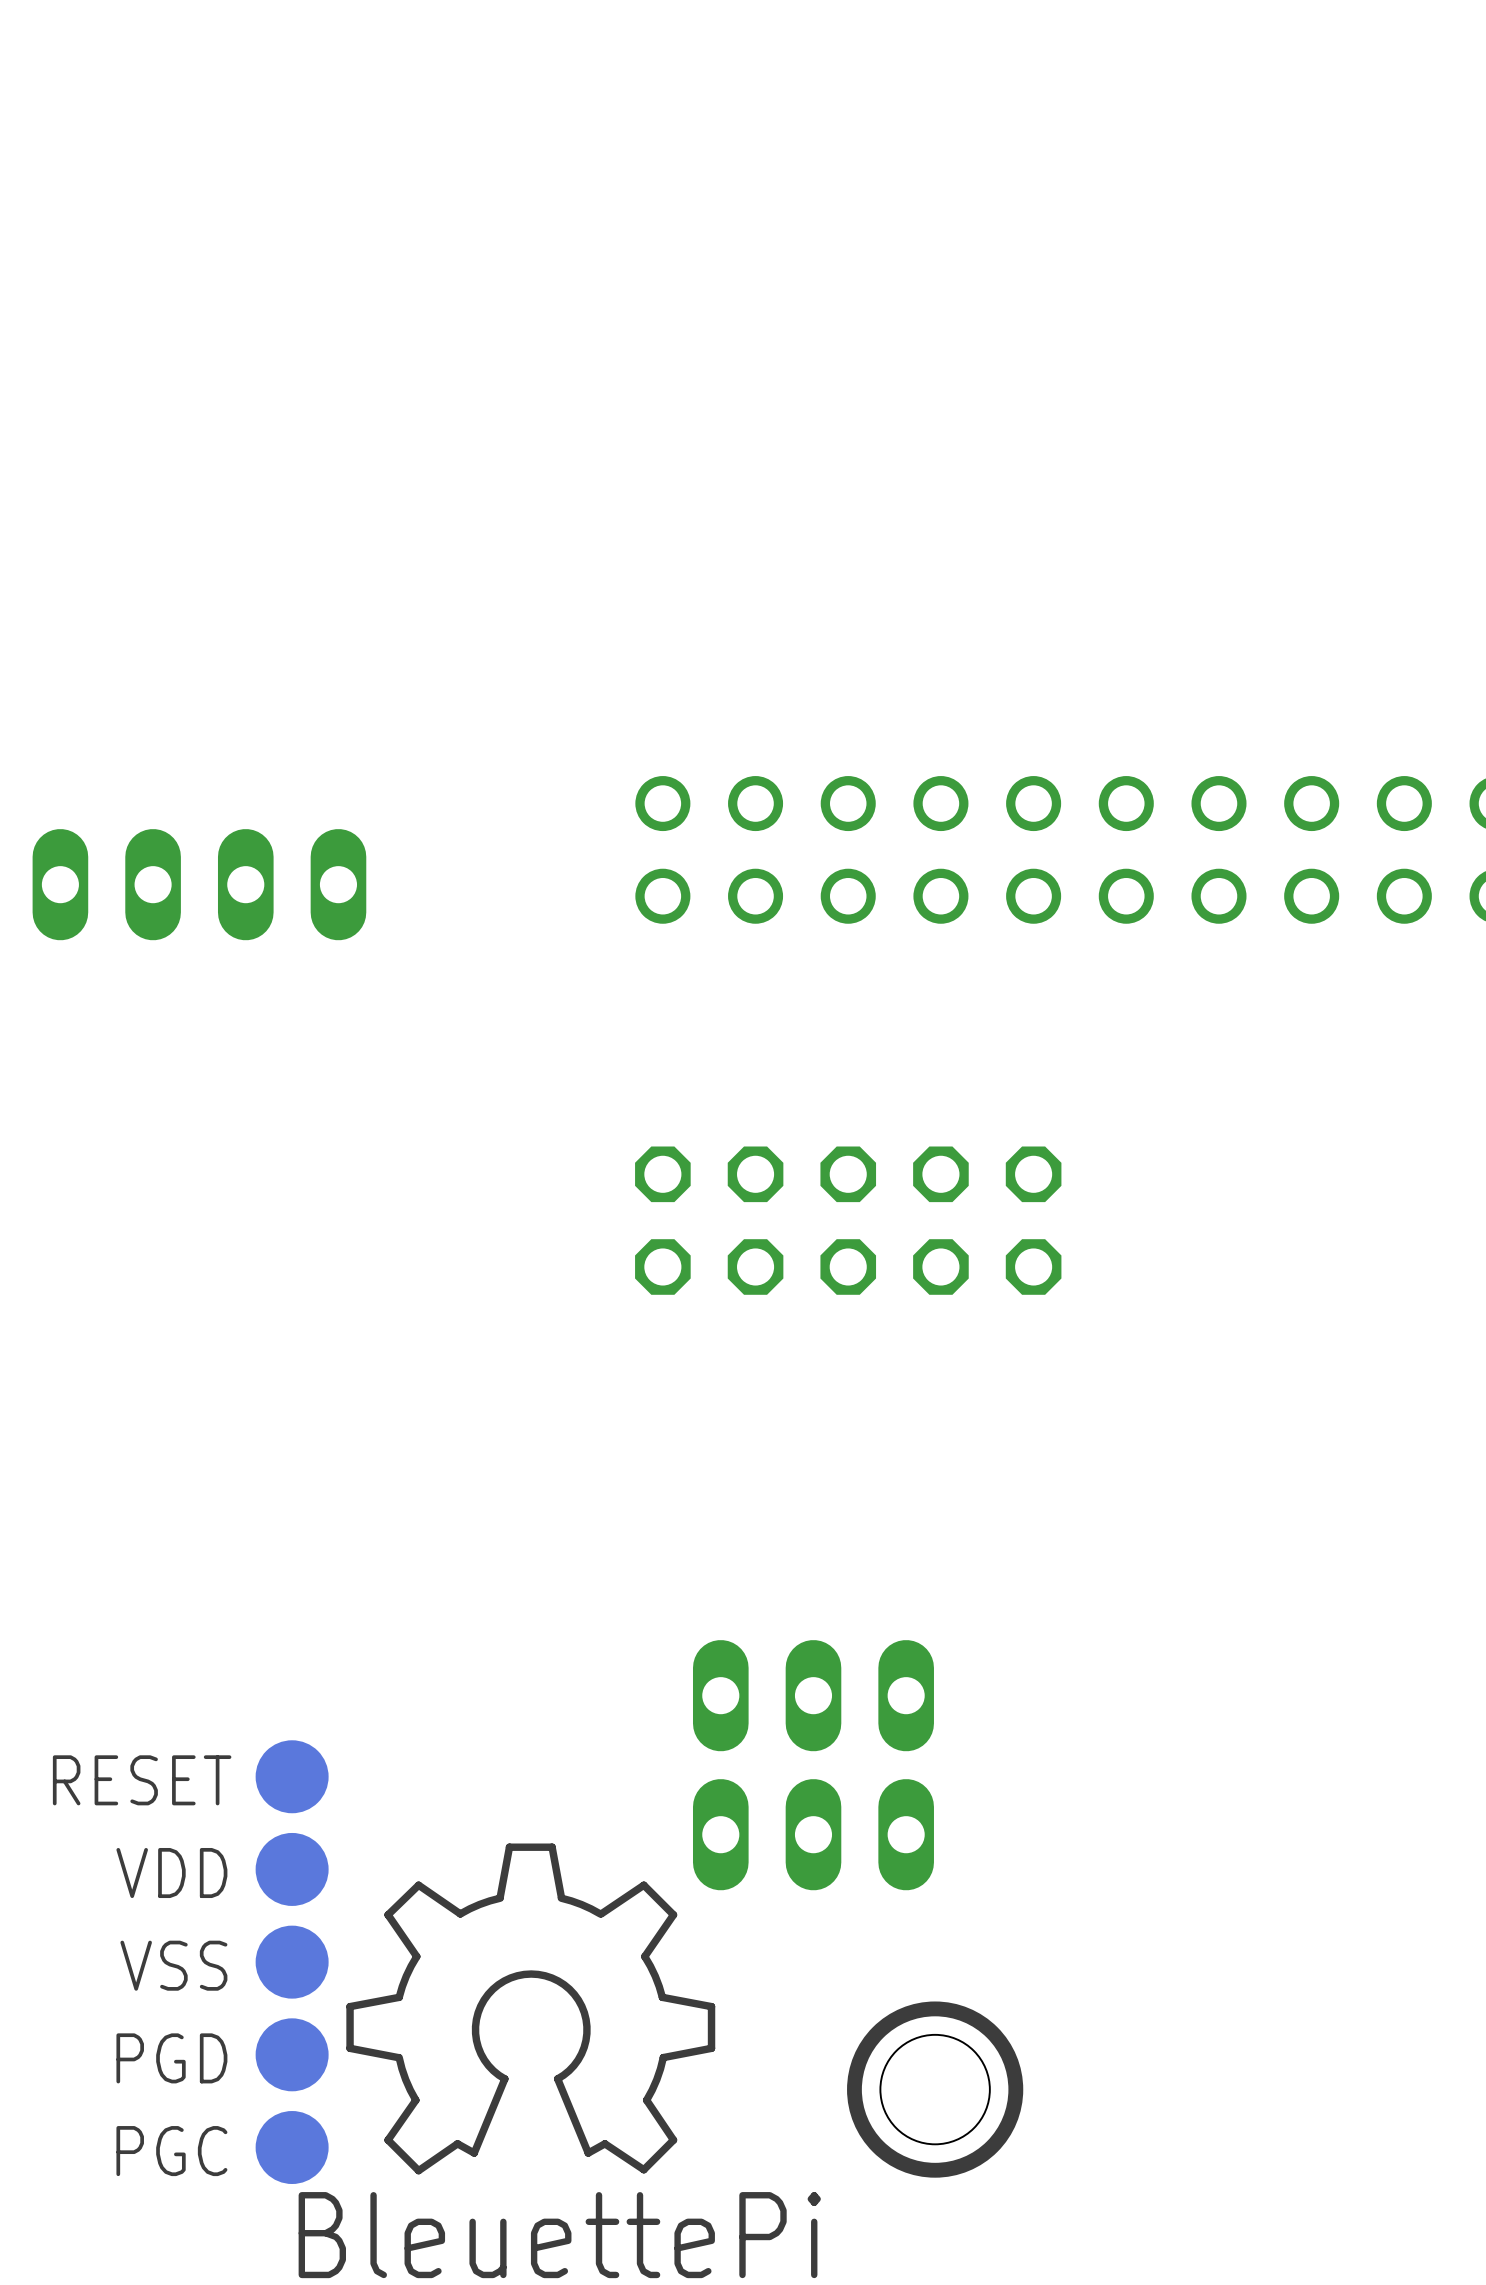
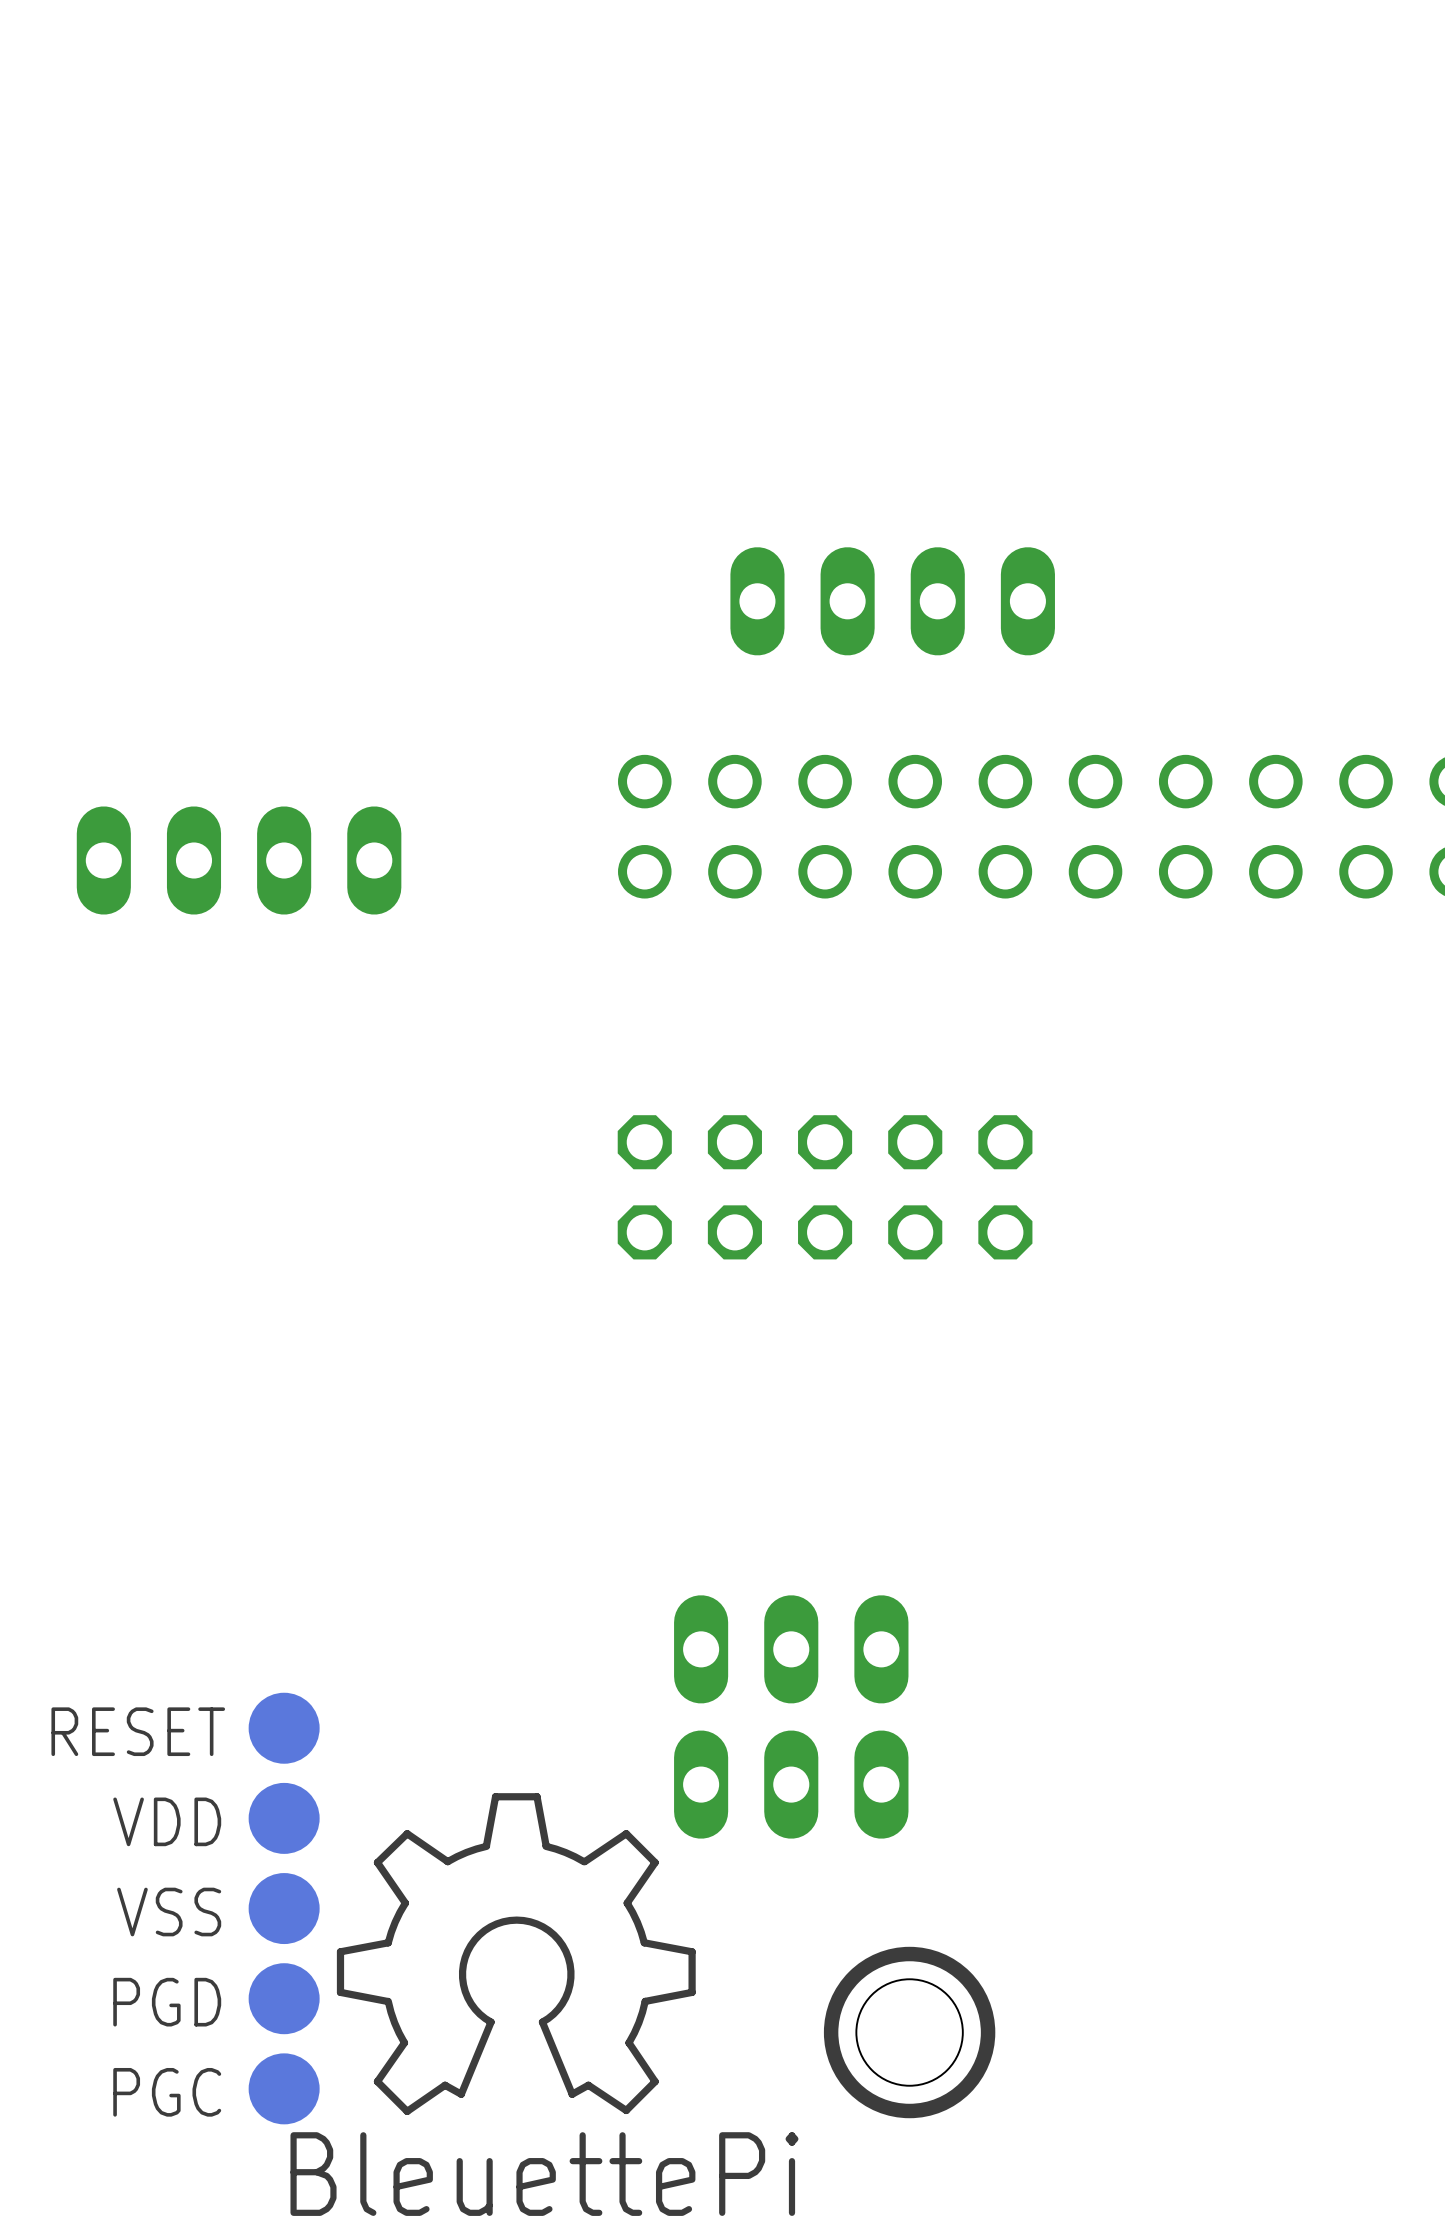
part: none -> (892, 601)
part position: (199, 884) -> (239, 860)

